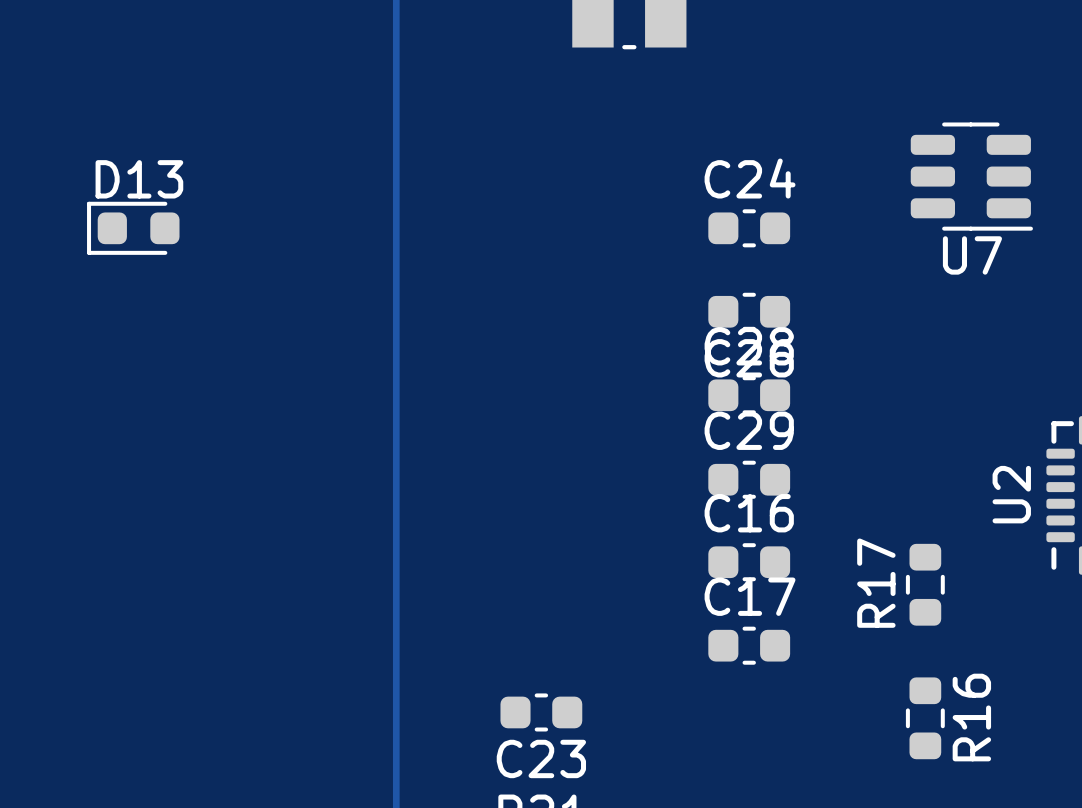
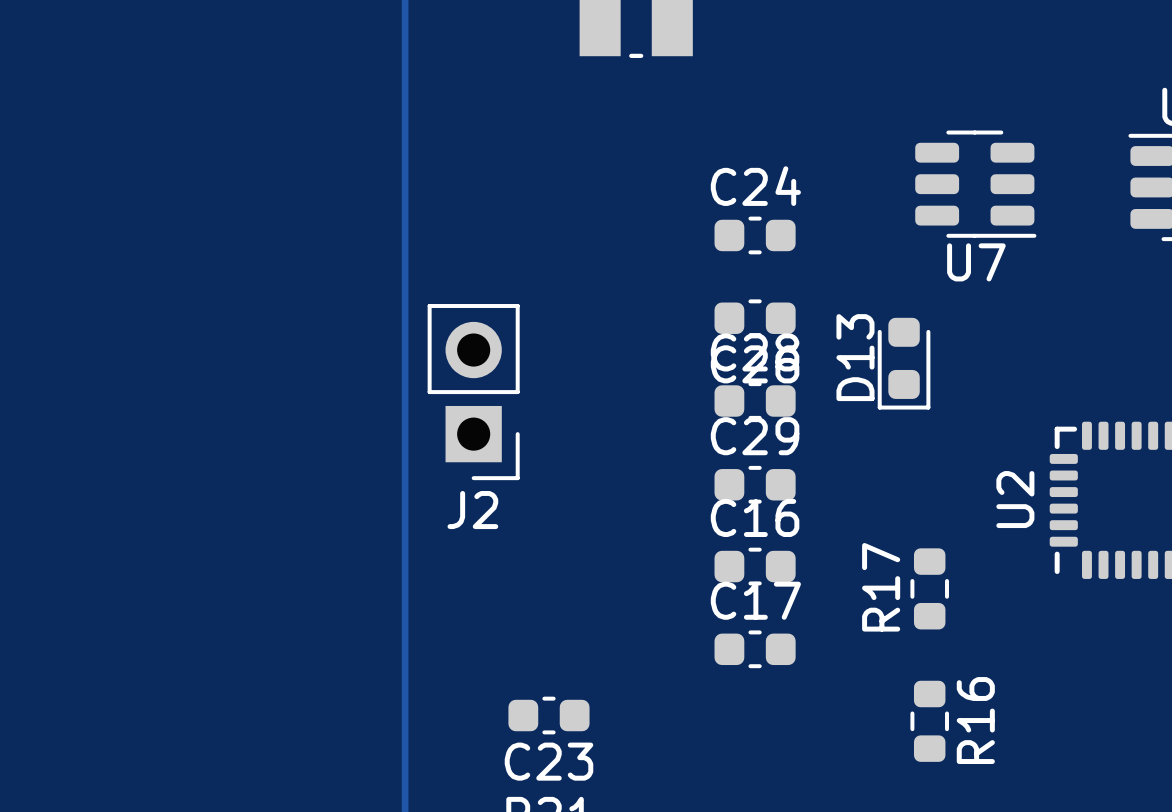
D13 rotation: 0° (133, 228) -> 90° counterclockwise (904, 363)
D13 position: (133, 228) -> (904, 363)
J2: none -> (473, 392)

